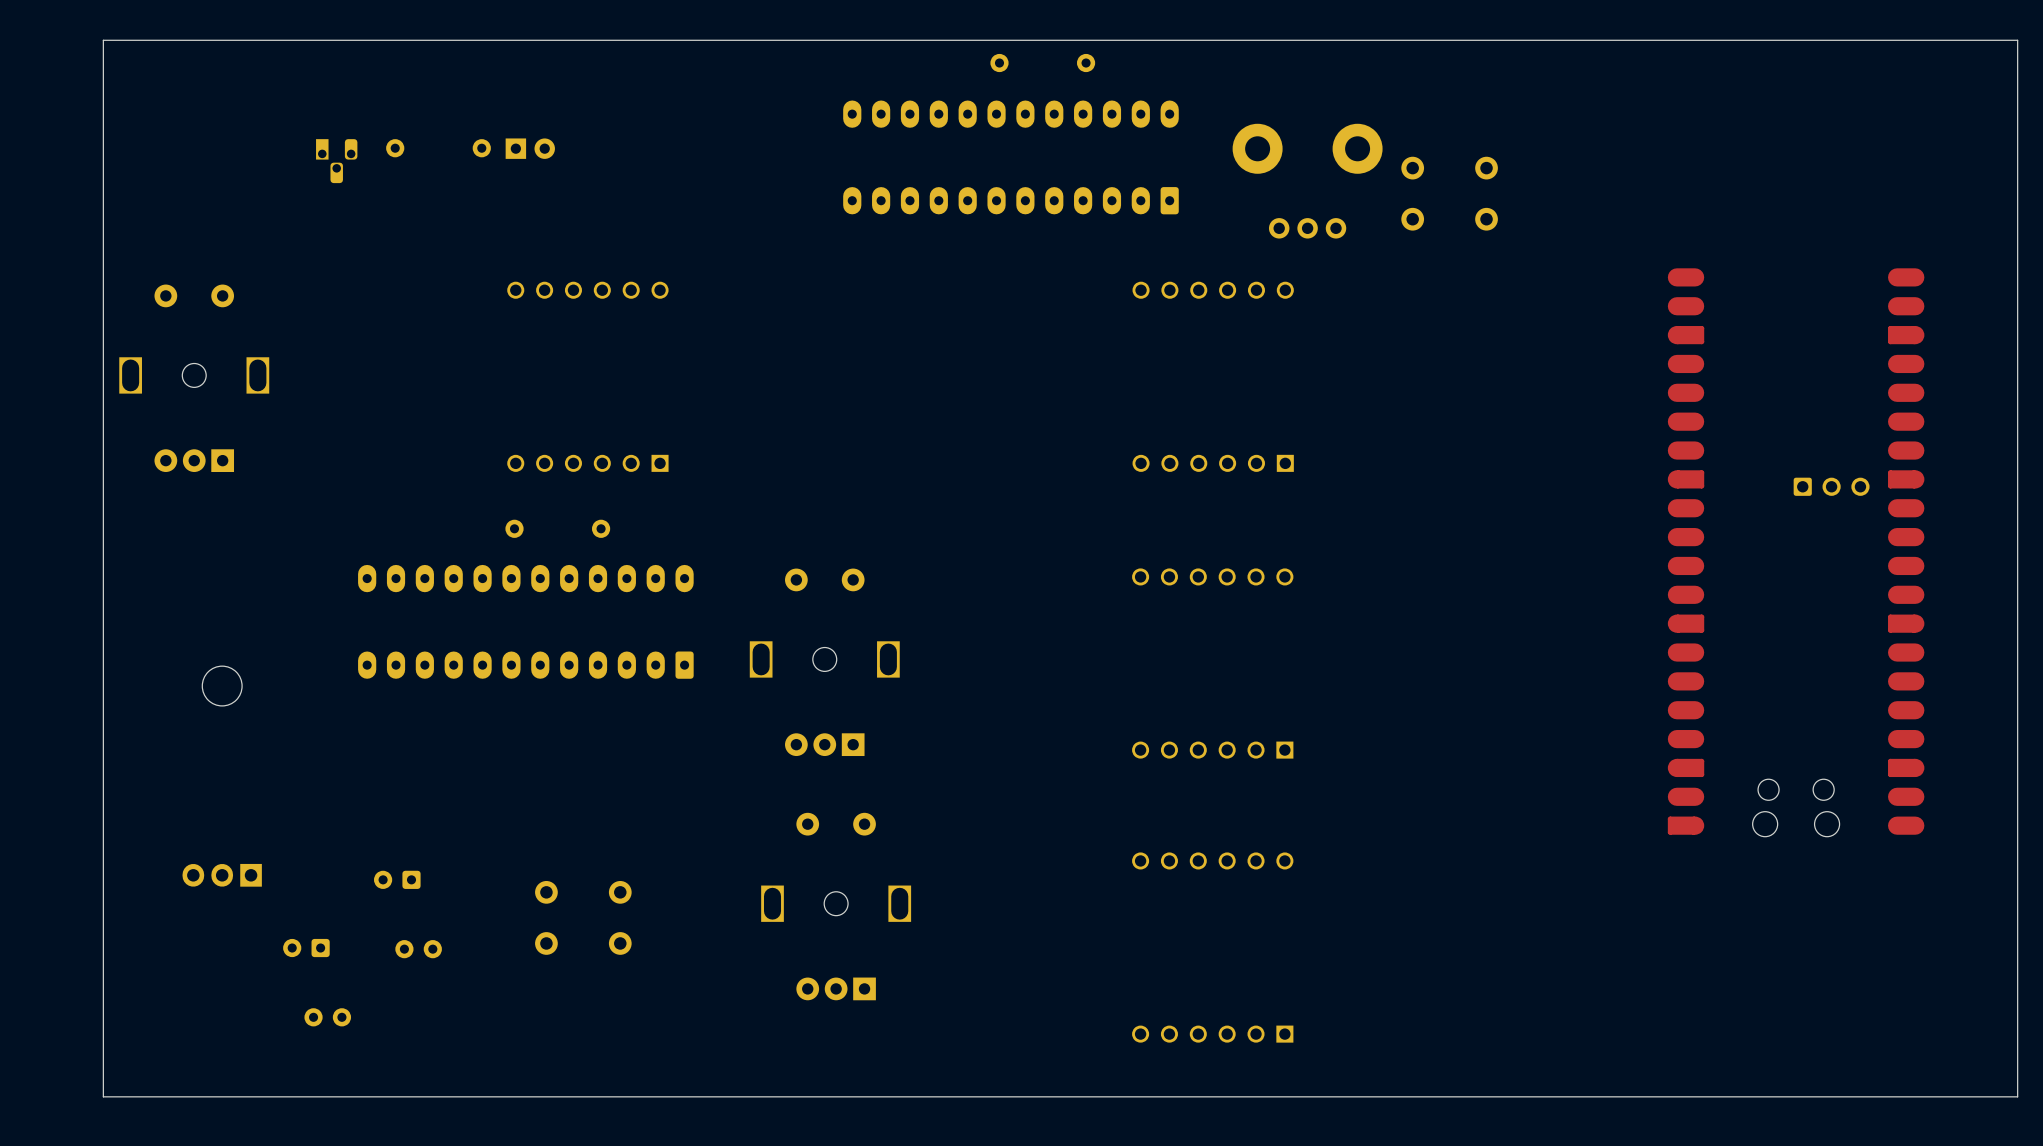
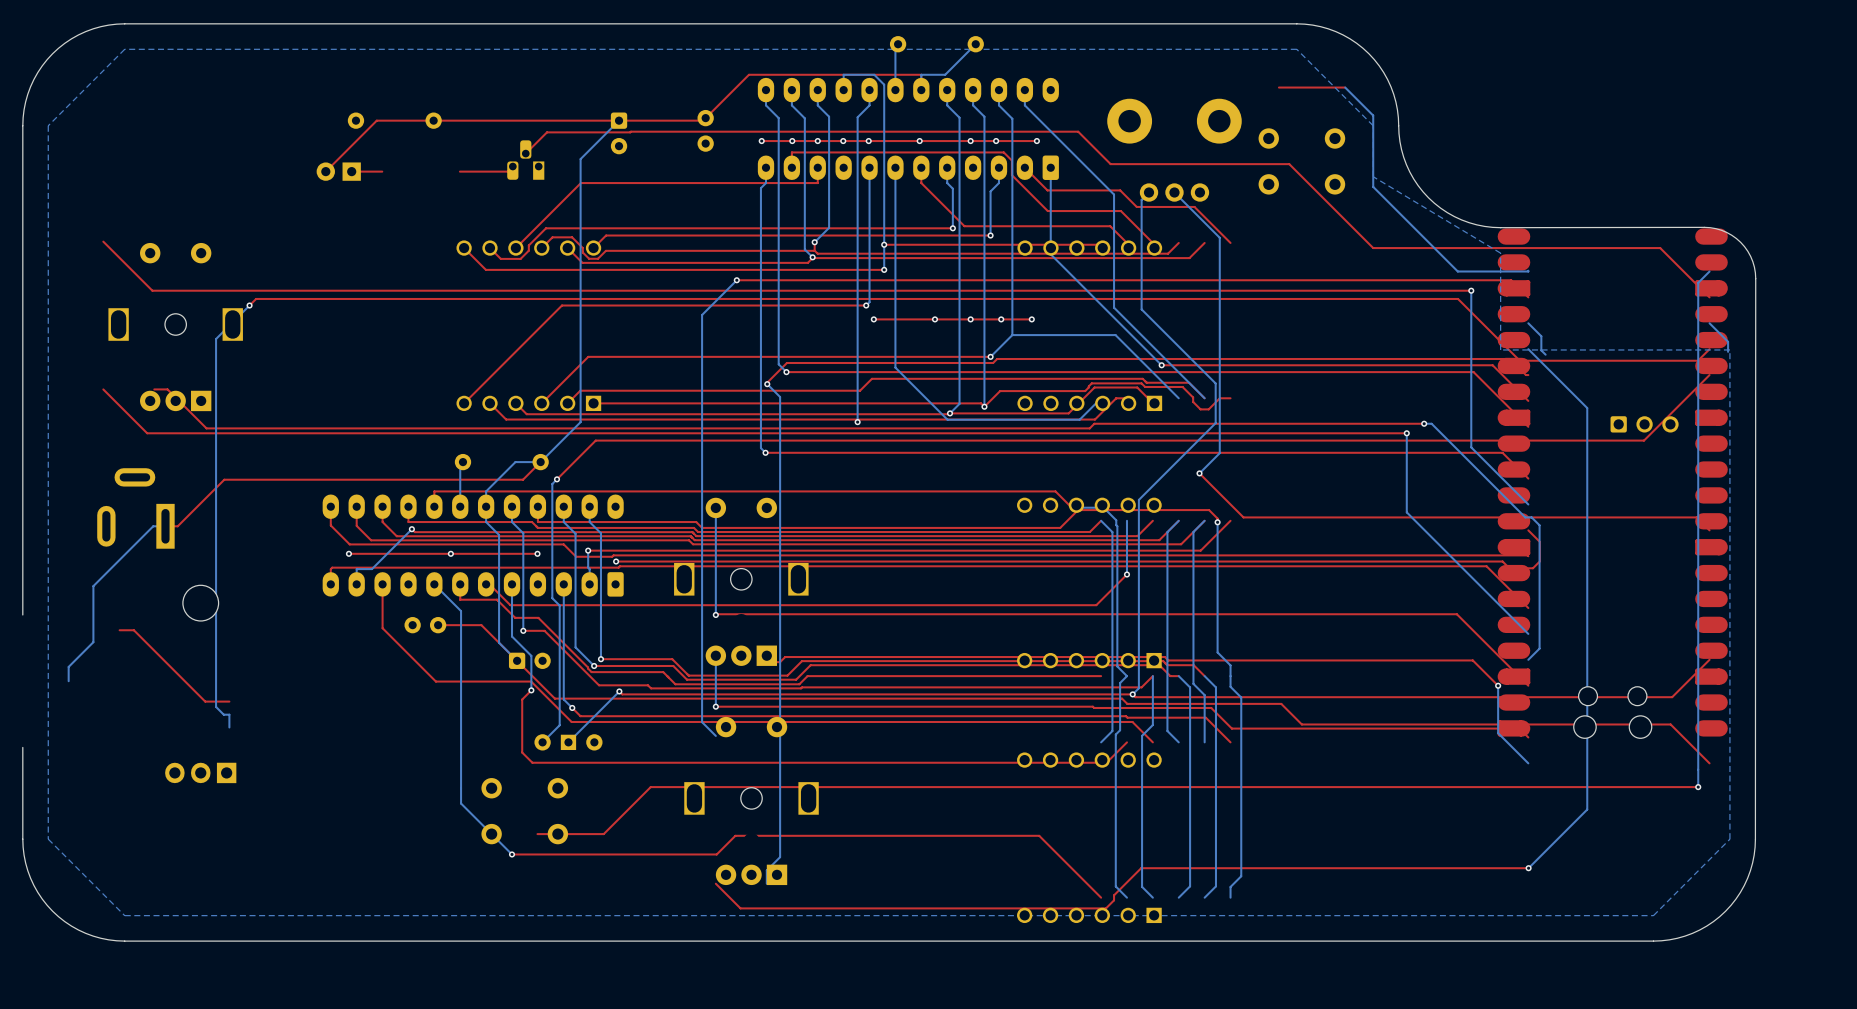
board edge: none -> (124, 23) (108, 25) (85, 31) (58, 48) (37, 72) (27, 94) (24, 109) (22, 614)
board edge: (1443, 40) (2017, 40) (2017, 1096) (103, 1096) (103, 40) (137, 40) -> (1296, 23) (1320, 26) (1343, 34) (1362, 48) (1374, 59) (1383, 72) (1393, 94) (1397, 109) (1401, 149) (1409, 172) (1428, 197) (1454, 216) (1476, 224) (1492, 227) (1710, 227) (1726, 232) (1736, 238) (1750, 256) (1755, 278) (1755, 847) (1750, 870) (1740, 892) (1725, 911) (1706, 926) (1677, 938) (1653, 941) (116, 940) (93, 936) (71, 926) (52, 911) (33, 885) (27, 870) (23, 847) (22, 747)
bottom track: none -> (898, 44) (895, 46) (895, 90)
bottom track: none -> (975, 44) (945, 74) (921, 74) (921, 90)
bottom zone outline: none -> (1296, 49) (124, 49) (48, 125) (48, 839) (124, 915) (1653, 915) (1729, 839) (1729, 349) (1500, 349) (1500, 253) (1373, 176) (1373, 125) (1296, 49)
top track: none -> (1345, 87) (1278, 87)
bottom track: none -> (1345, 87) (1373, 115) (1373, 186) (1457, 271) (1528, 270)
bottom track: none -> (765, 90) (765, 105) (778, 118) (778, 364) (786, 372)
bottom track: none -> (791, 90) (791, 105) (804, 118) (804, 249) (812, 257)
bottom track: none -> (817, 90) (817, 105) (829, 116) (829, 227) (814, 242)
bottom track: none -> (843, 90) (843, 74) (874, 74) (884, 84) (884, 269)
bottom track: none -> (869, 90) (869, 105) (857, 117) (857, 422)
top track: none -> (921, 90) (921, 74) (748, 74) (703, 120) (376, 120) (325, 171)
bottom track: none -> (947, 90) (947, 105) (959, 117) (959, 403) (950, 413)
bottom track: none -> (973, 90) (973, 105) (984, 116) (984, 406)
bottom track: none -> (998, 90) (998, 105) (1012, 118) (1012, 335)
bottom track: none -> (1024, 90) (1024, 105) (1114, 194) (1114, 307) (1204, 398)
part rotation: 0° (530, 148) -> 180° (338, 171)
part position: (530, 148) -> (338, 171)
bottom track: none -> (619, 120) (580, 159) (580, 422) (540, 462) (515, 462) (486, 491) (486, 522) (499, 534) (499, 642) (517, 660)
part: none -> (705, 130)
part rotation: 0° (336, 161) -> 180° (525, 160)
part position: (336, 161) -> (525, 160)
part: none -> (619, 133)
via: none -> (761, 141)
via: none -> (792, 141)
via: none -> (817, 141)
via: none -> (843, 141)
via: none -> (868, 141)
via: none -> (919, 141)
via: none -> (970, 141)
via: none -> (996, 141)
top track: none -> (1036, 141) (761, 141)
via: none -> (1036, 141)
top track: none -> (525, 153) (546, 132) (1078, 131) (1110, 164) (1289, 164) (1373, 248) (1660, 248) (1709, 297)
top track: none -> (512, 166) (507, 171) (459, 171)
bottom track: none -> (765, 167) (765, 183) (760, 188) (760, 448) (765, 452)
top track: none -> (791, 167) (791, 152) (1003, 152) (1011, 160) (1011, 175) (1047, 211) (1120, 211) (1152, 242)
top track: none -> (817, 167) (817, 183) (580, 183) (515, 248)
bottom track: none -> (869, 167) (869, 302) (866, 305)
bottom track: none -> (895, 167) (895, 367) (947, 419) (1079, 419) (1101, 398)
top track: none -> (921, 167) (921, 183) (964, 226) (1110, 226) (1126, 242)
bottom track: none -> (947, 167) (947, 183) (952, 188) (952, 228)
bottom track: none -> (998, 167) (998, 183) (990, 191) (990, 235)
top track: none -> (1024, 167) (1047, 190) (1120, 190) (1136, 206) (1194, 206) (1230, 242)
bottom track: none -> (1050, 167) (1050, 254) (1161, 365)
top track: none -> (382, 171) (351, 171)
bottom track: none -> (1149, 192) (1141, 199) (1141, 309) (1215, 383) (1215, 423) (1138, 499) (1138, 688) (1132, 694)
bottom track: none -> (1174, 192) (1219, 237) (1219, 453) (1199, 473)
top track: none -> (952, 228) (546, 228) (528, 245) (528, 250) (520, 258) (500, 258) (490, 248)
via: none -> (952, 228)
top track: none -> (990, 235) (606, 235) (593, 248)
via: none -> (990, 235)
top track: none -> (103, 241) (152, 290) (1471, 290)
top track: none -> (814, 242) (814, 250)
via: none -> (814, 242)
top track: none -> (1101, 242) (1099, 244) (884, 244)
top track: none -> (1178, 242) (1168, 253) (817, 253) (814, 250) (605, 250) (597, 258) (589, 258) (582, 252) (582, 248) (572, 237) (552, 237) (541, 248)
top track: none -> (1204, 242) (1189, 258) (812, 258)
via: none -> (884, 244)
top track: none -> (464, 248) (485, 269) (884, 269)
top track: none -> (567, 248) (582, 262) (807, 262) (812, 258)
via: none -> (812, 257)
via: none -> (884, 269)
bottom track: none -> (1709, 271) (1698, 282) (1698, 787)
top track: none -> (736, 280) (1511, 280) (1528, 297)
bottom track: none -> (736, 280) (702, 314) (702, 722) (715, 735)
via: none -> (736, 280)
bottom track: none -> (1471, 290) (1471, 447) (1528, 504)
via: none -> (1471, 290)
top track: none -> (249, 305) (256, 298) (1458, 298) (1519, 360) (1697, 360) (1709, 349)
bottom track: none -> (249, 305) (216, 339) (216, 706) (223, 714) (229, 714) (229, 727)
via: none -> (249, 305)
top track: none -> (866, 305) (561, 305) (464, 403)
via: none -> (866, 305)
via: none -> (873, 319)
via: none -> (934, 319)
via: none -> (970, 319)
via: none -> (1001, 319)
top track: none -> (1031, 319) (873, 319)
via: none -> (1031, 319)
bottom track: none -> (1528, 323) (1541, 336) (1541, 350) (1545, 354)
bottom track: none -> (1709, 323) (1728, 341) (1728, 351)
bottom track: none -> (1012, 335) (990, 356)
bottom track: none -> (1012, 335) (1115, 335) (1178, 398)
bottom track: none -> (1528, 349) (1587, 408) (1587, 809) (1528, 868)
top track: none -> (990, 356) (588, 356) (541, 403)
via: none -> (990, 356)
top track: none -> (1161, 365) (1492, 365) (1528, 400)
via: none -> (1161, 365)
top track: none -> (786, 372) (1473, 372) (1528, 426)
via: none -> (786, 372)
top track: none -> (1528, 375) (1525, 375) (1509, 358) (997, 358) (993, 362) (786, 362) (767, 384)
top track: none -> (1709, 375) (1644, 440) (595, 440) (557, 479)
bottom track: none -> (767, 384) (780, 397) (780, 857) (766, 870) (766, 883)
via: none -> (767, 384)
top track: none -> (103, 389) (147, 433) (1406, 433)
top track: none -> (154, 389) (167, 389) (206, 428) (1089, 428) (1094, 423) (1424, 423)
top track: none -> (1126, 398) (1116, 398) (1095, 419) (506, 419) (490, 403)
top track: none -> (1152, 398) (1148, 398) (1137, 387) (1094, 387) (1068, 413) (526, 414) (515, 403)
top track: none -> (1204, 398) (1189, 382) (1146, 382) (1142, 378) (871, 378) (860, 390) (580, 390) (567, 403)
top track: none -> (1230, 398) (1219, 398) (1208, 409) (1200, 409) (1193, 401) (1193, 397) (1182, 386) (1145, 386) (1141, 383) (1091, 383) (1085, 391) (1000, 391) (984, 406) (981, 403) (593, 403)
via: none -> (984, 406)
via: none -> (950, 413)
via: none -> (857, 422)
bottom track: none -> (1424, 423) (1431, 423) (1525, 517) (1531, 517) (1539, 525) (1539, 648) (1528, 659)
via: none -> (1424, 423)
bottom track: none -> (1406, 433) (1406, 512) (1528, 633)
via: none -> (1406, 433)
top track: none -> (765, 452) (1502, 452) (1528, 478)
via: none -> (765, 452)
bottom track: none -> (462, 462) (460, 464) (460, 506)
top track: none -> (540, 462) (523, 479) (224, 479) (177, 526) (165, 526)
top track: none -> (1199, 473) (1243, 517) (1696, 517) (1709, 530)
via: none -> (1199, 473)
bottom track: none -> (557, 479) (552, 484) (552, 598) (559, 605) (559, 725) (542, 742)
via: none -> (557, 479)
top track: none -> (330, 506) (330, 525) (349, 544) (563, 544) (576, 556) (1528, 556)
top track: none -> (356, 506) (356, 525) (371, 540) (689, 540) (693, 544) (1181, 544) (1204, 520)
top track: none -> (382, 506) (382, 522) (396, 536) (690, 536) (694, 540) (1159, 540) (1178, 520)
top track: none -> (408, 506) (408, 522) (532, 522) (537, 527) (694, 527) (698, 532) (1089, 532) (1101, 520)
top track: none -> (434, 506) (434, 491) (1055, 491) (1071, 507)
bottom track: none -> (512, 506) (512, 522) (523, 533) (523, 630)
top track: none -> (537, 506) (537, 522) (696, 522) (702, 527) (1060, 527) (1078, 510) (1209, 510) (1217, 518) (1217, 522)
bottom track: none -> (563, 506) (563, 522) (575, 533) (575, 647) (594, 665)
bottom track: none -> (589, 506) (589, 522) (600, 533) (600, 659)
bottom track: none -> (1071, 507) (1103, 507) (1116, 520) (1117, 526) (1117, 666) (1126, 676) (1120, 683) (1120, 730) (1115, 734) (1115, 886) (1126, 897)
part: none -> (135, 508)
bottom track: none -> (715, 514) (715, 614)
bottom track: none -> (1101, 520) (1112, 532) (1112, 731) (1101, 742)
bottom track: none -> (1126, 520) (1126, 574)
top track: none -> (1152, 520) (1137, 536) (696, 536) (692, 532) (414, 532) (411, 529)
bottom track: none -> (1178, 520) (1167, 532) (1167, 731) (1178, 742)
bottom track: none -> (1204, 520) (1193, 531) (1193, 683) (1204, 695) (1204, 742)
top track: none -> (1230, 520) (1200, 550) (588, 550)
bottom track: none -> (1217, 522) (1217, 652) (1230, 665) (1230, 686) (1241, 697) (1241, 876) (1230, 886) (1230, 897)
via: none -> (1217, 522)
bottom track: none -> (165, 526) (153, 526) (93, 586) (93, 642) (68, 666) (68, 681)
bottom track: none -> (411, 529) (371, 569) (356, 569) (356, 584)
via: none -> (411, 529)
top track: none -> (1528, 530) (1539, 541) (1539, 561) (1532, 568) (1509, 568) (1502, 561) (616, 561)
bottom track: none -> (588, 550) (589, 584)
via: none -> (588, 550)
via: none -> (348, 553)
via: none -> (450, 553)
top track: none -> (537, 553) (348, 553)
via: none -> (537, 553)
via: none -> (616, 561)
top track: none -> (1126, 574) (1096, 605) (510, 605) (489, 584) (486, 584)
via: none -> (1126, 574)
top track: none -> (330, 584) (332, 567) (1486, 566) (1528, 608)
top track: none -> (382, 584) (382, 628) (435, 681) (531, 681) (571, 721) (1132, 721) (1152, 742)
bottom track: none -> (434, 584) (461, 611) (461, 803) (512, 854)
top track: none -> (460, 584) (460, 599) (497, 599) (515, 617) (538, 617) (591, 672) (663, 672) (675, 684) (799, 684) (807, 676) (1101, 676)
bottom track: none -> (512, 584) (512, 636) (531, 655) (531, 690)
bottom track: none -> (563, 584) (563, 699) (572, 707)
top track: none -> (716, 614) (1456, 614) (1528, 685)
via: none -> (715, 614)
part: none -> (425, 625)
top track: none -> (438, 625) (481, 625) (554, 698) (1122, 698) (1127, 703) (1281, 703) (1301, 724) (1670, 724) (1709, 763)
top track: none -> (119, 630) (133, 630) (205, 701) (229, 701)
top track: none -> (523, 630) (544, 630) (599, 685) (647, 685) (651, 688) (1141, 687) (1152, 676)
via: none -> (523, 630)
top track: none -> (600, 659) (672, 659) (688, 675) (787, 675) (802, 661) (1163, 661) (1167, 665) (1193, 665) (1204, 676)
via: none -> (600, 659)
top track: none -> (1709, 659) (1672, 697) (622, 694) (619, 691)
part: none -> (529, 660)
bottom track: none -> (715, 662) (715, 706)
top track: none -> (766, 662) (780, 662) (785, 657) (1164, 657) (1168, 660) (1472, 660) (1498, 685)
top track: none -> (594, 665) (673, 665) (687, 679) (796, 679) (810, 665) (1159, 665) (1170, 676) (1178, 676)
via: none -> (594, 665)
bottom track: none -> (1152, 676) (1152, 725) (1142, 735) (1142, 886) (1152, 897)
bottom track: none -> (1178, 676) (1190, 687) (1190, 886) (1178, 897)
bottom track: none -> (1204, 676) (1215, 687) (1215, 886) (1204, 897)
bottom track: none -> (1498, 685) (1498, 733) (1528, 763)
via: none -> (1498, 685)
top track: none -> (531, 690) (522, 699) (522, 752) (532, 762) (1106, 762) (1126, 742)
via: none -> (531, 690)
bottom track: none -> (619, 691) (568, 742)
via: none -> (619, 691)
via: none -> (1132, 694)
top track: none -> (715, 706) (1211, 707) (1231, 728) (1519, 728) (1528, 737)
via: none -> (715, 706)
top track: none -> (572, 707) (580, 716) (1205, 717) (1230, 742)
via: none -> (572, 707)
part: none -> (568, 742)
part: (397, 879) -> none
top track: none -> (1698, 787) (650, 787) (603, 834) (537, 834)
via: none -> (1698, 787)
part: (306, 948) -> none
part: (418, 949) -> none
top track: none -> (512, 854) (716, 854) (735, 835) (1039, 835) (1101, 897)
via: none -> (512, 854)
top track: none -> (1528, 868) (1141, 868) (1114, 895) (1114, 900) (1105, 908) (740, 908) (715, 883)
via: none -> (1528, 868)
part: (327, 1017) -> none

